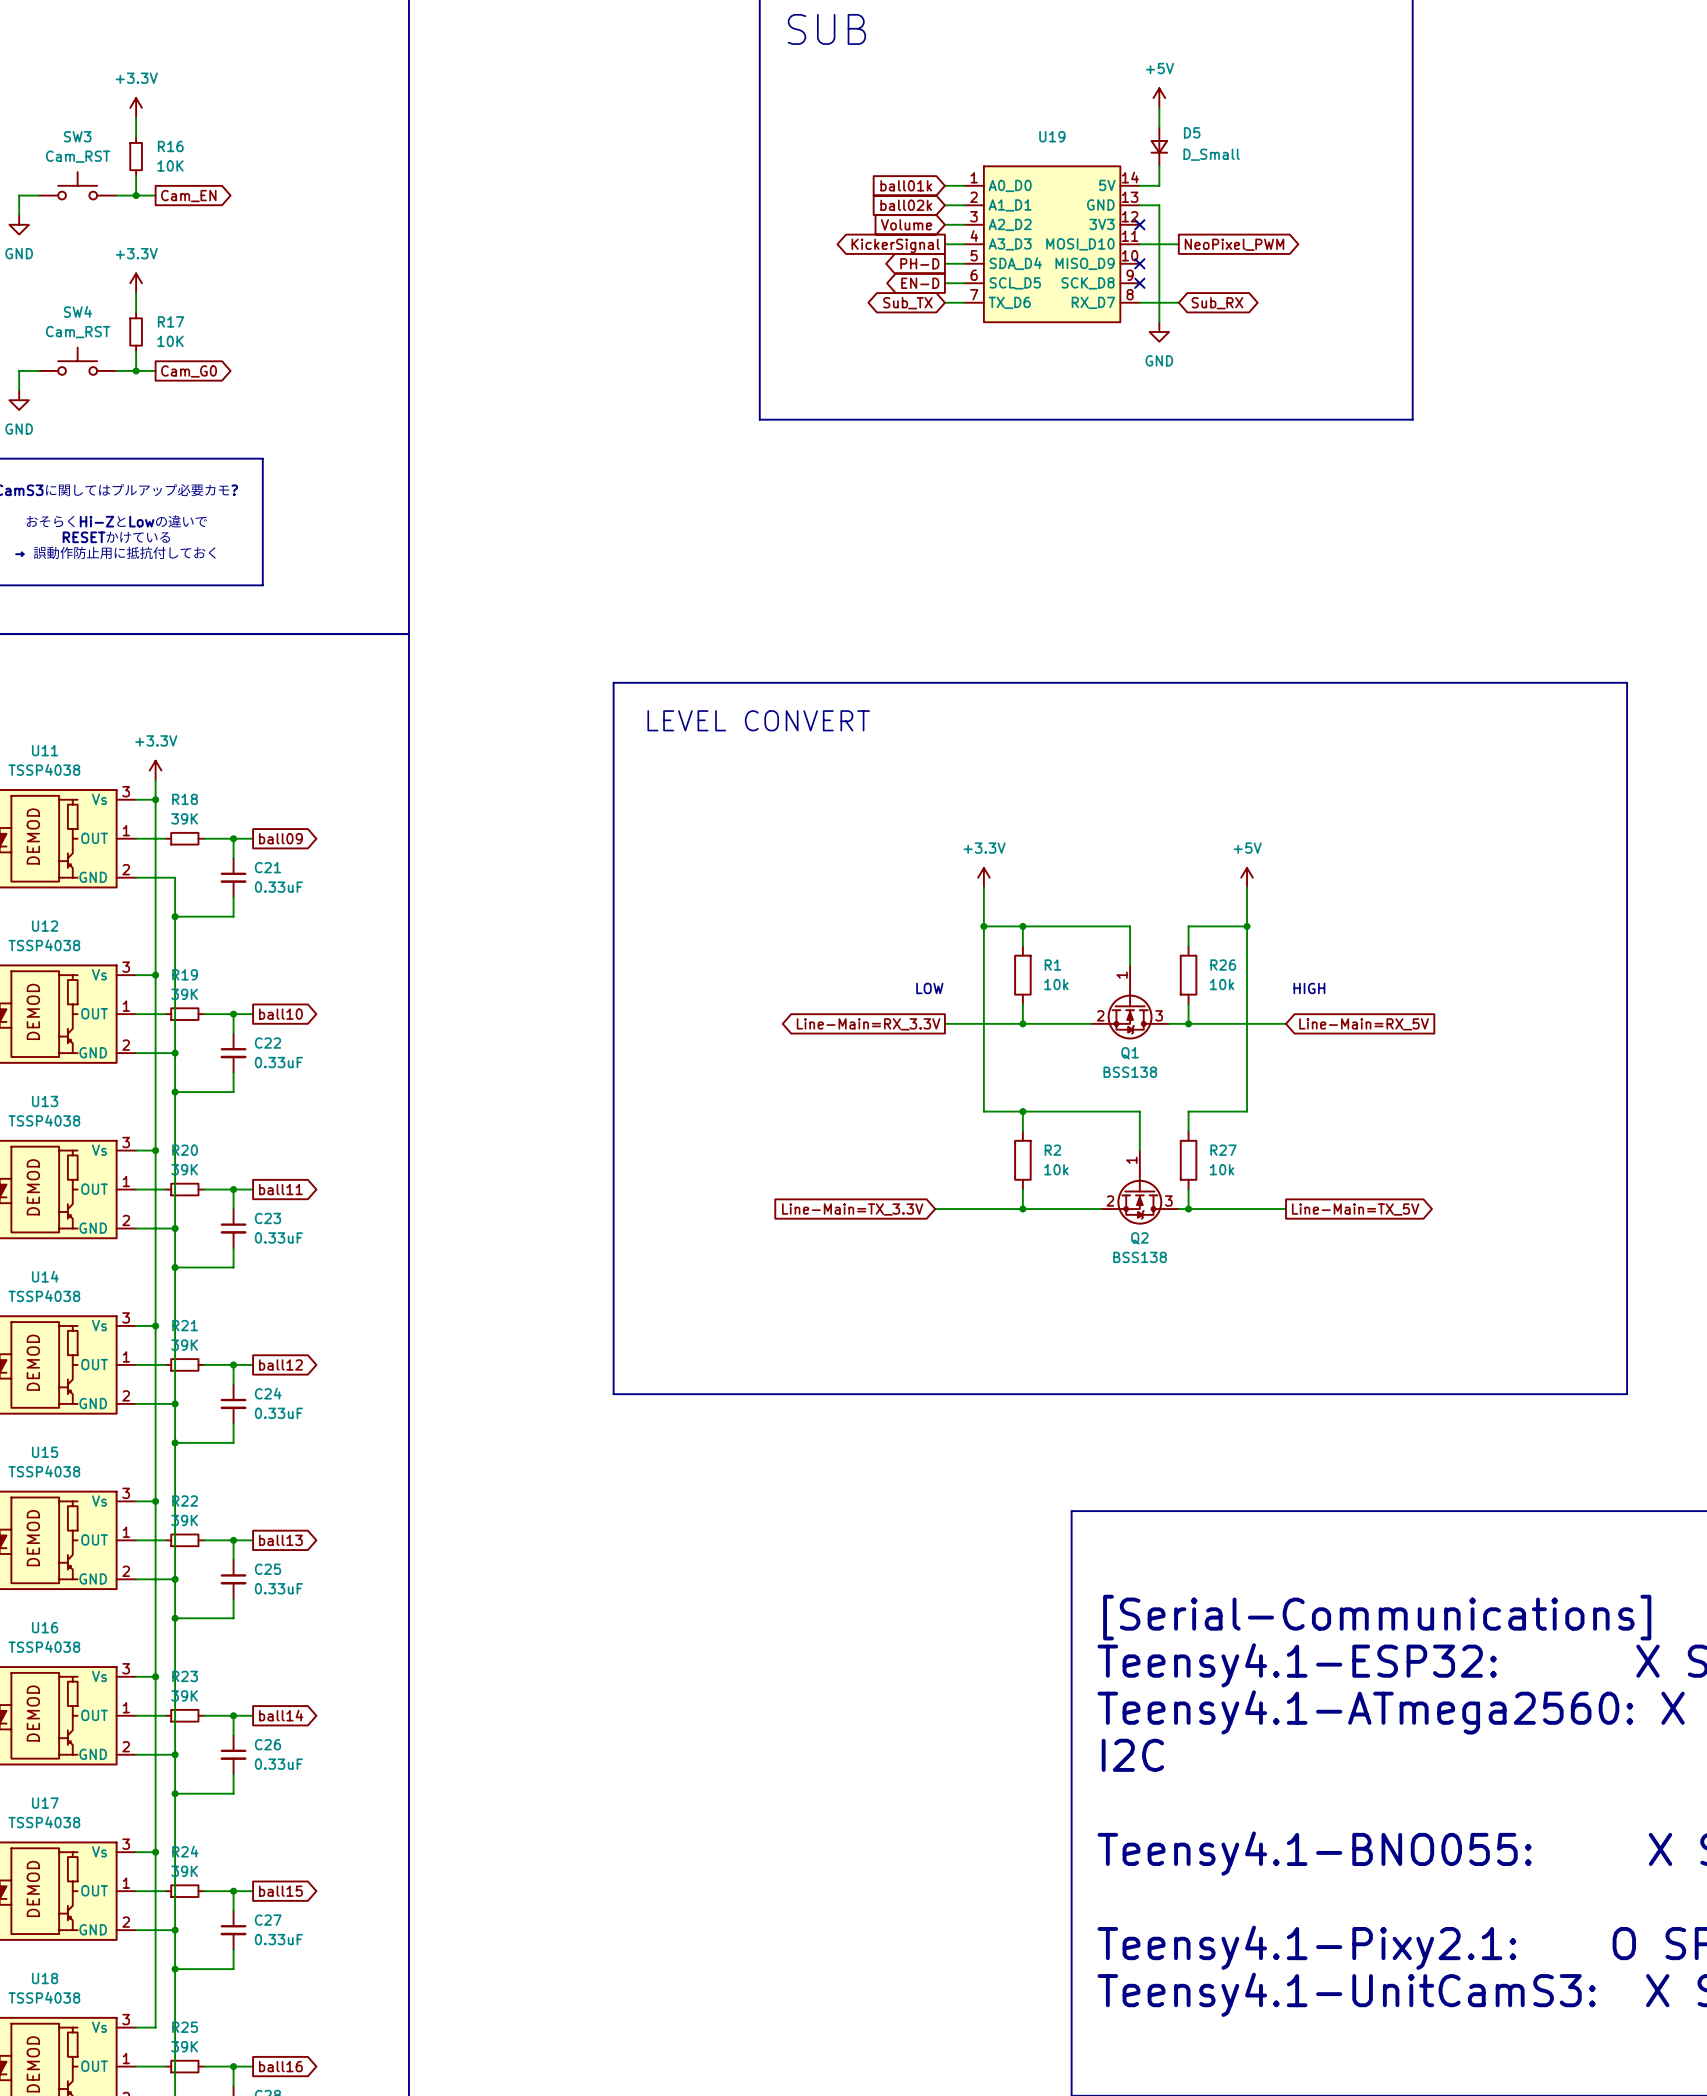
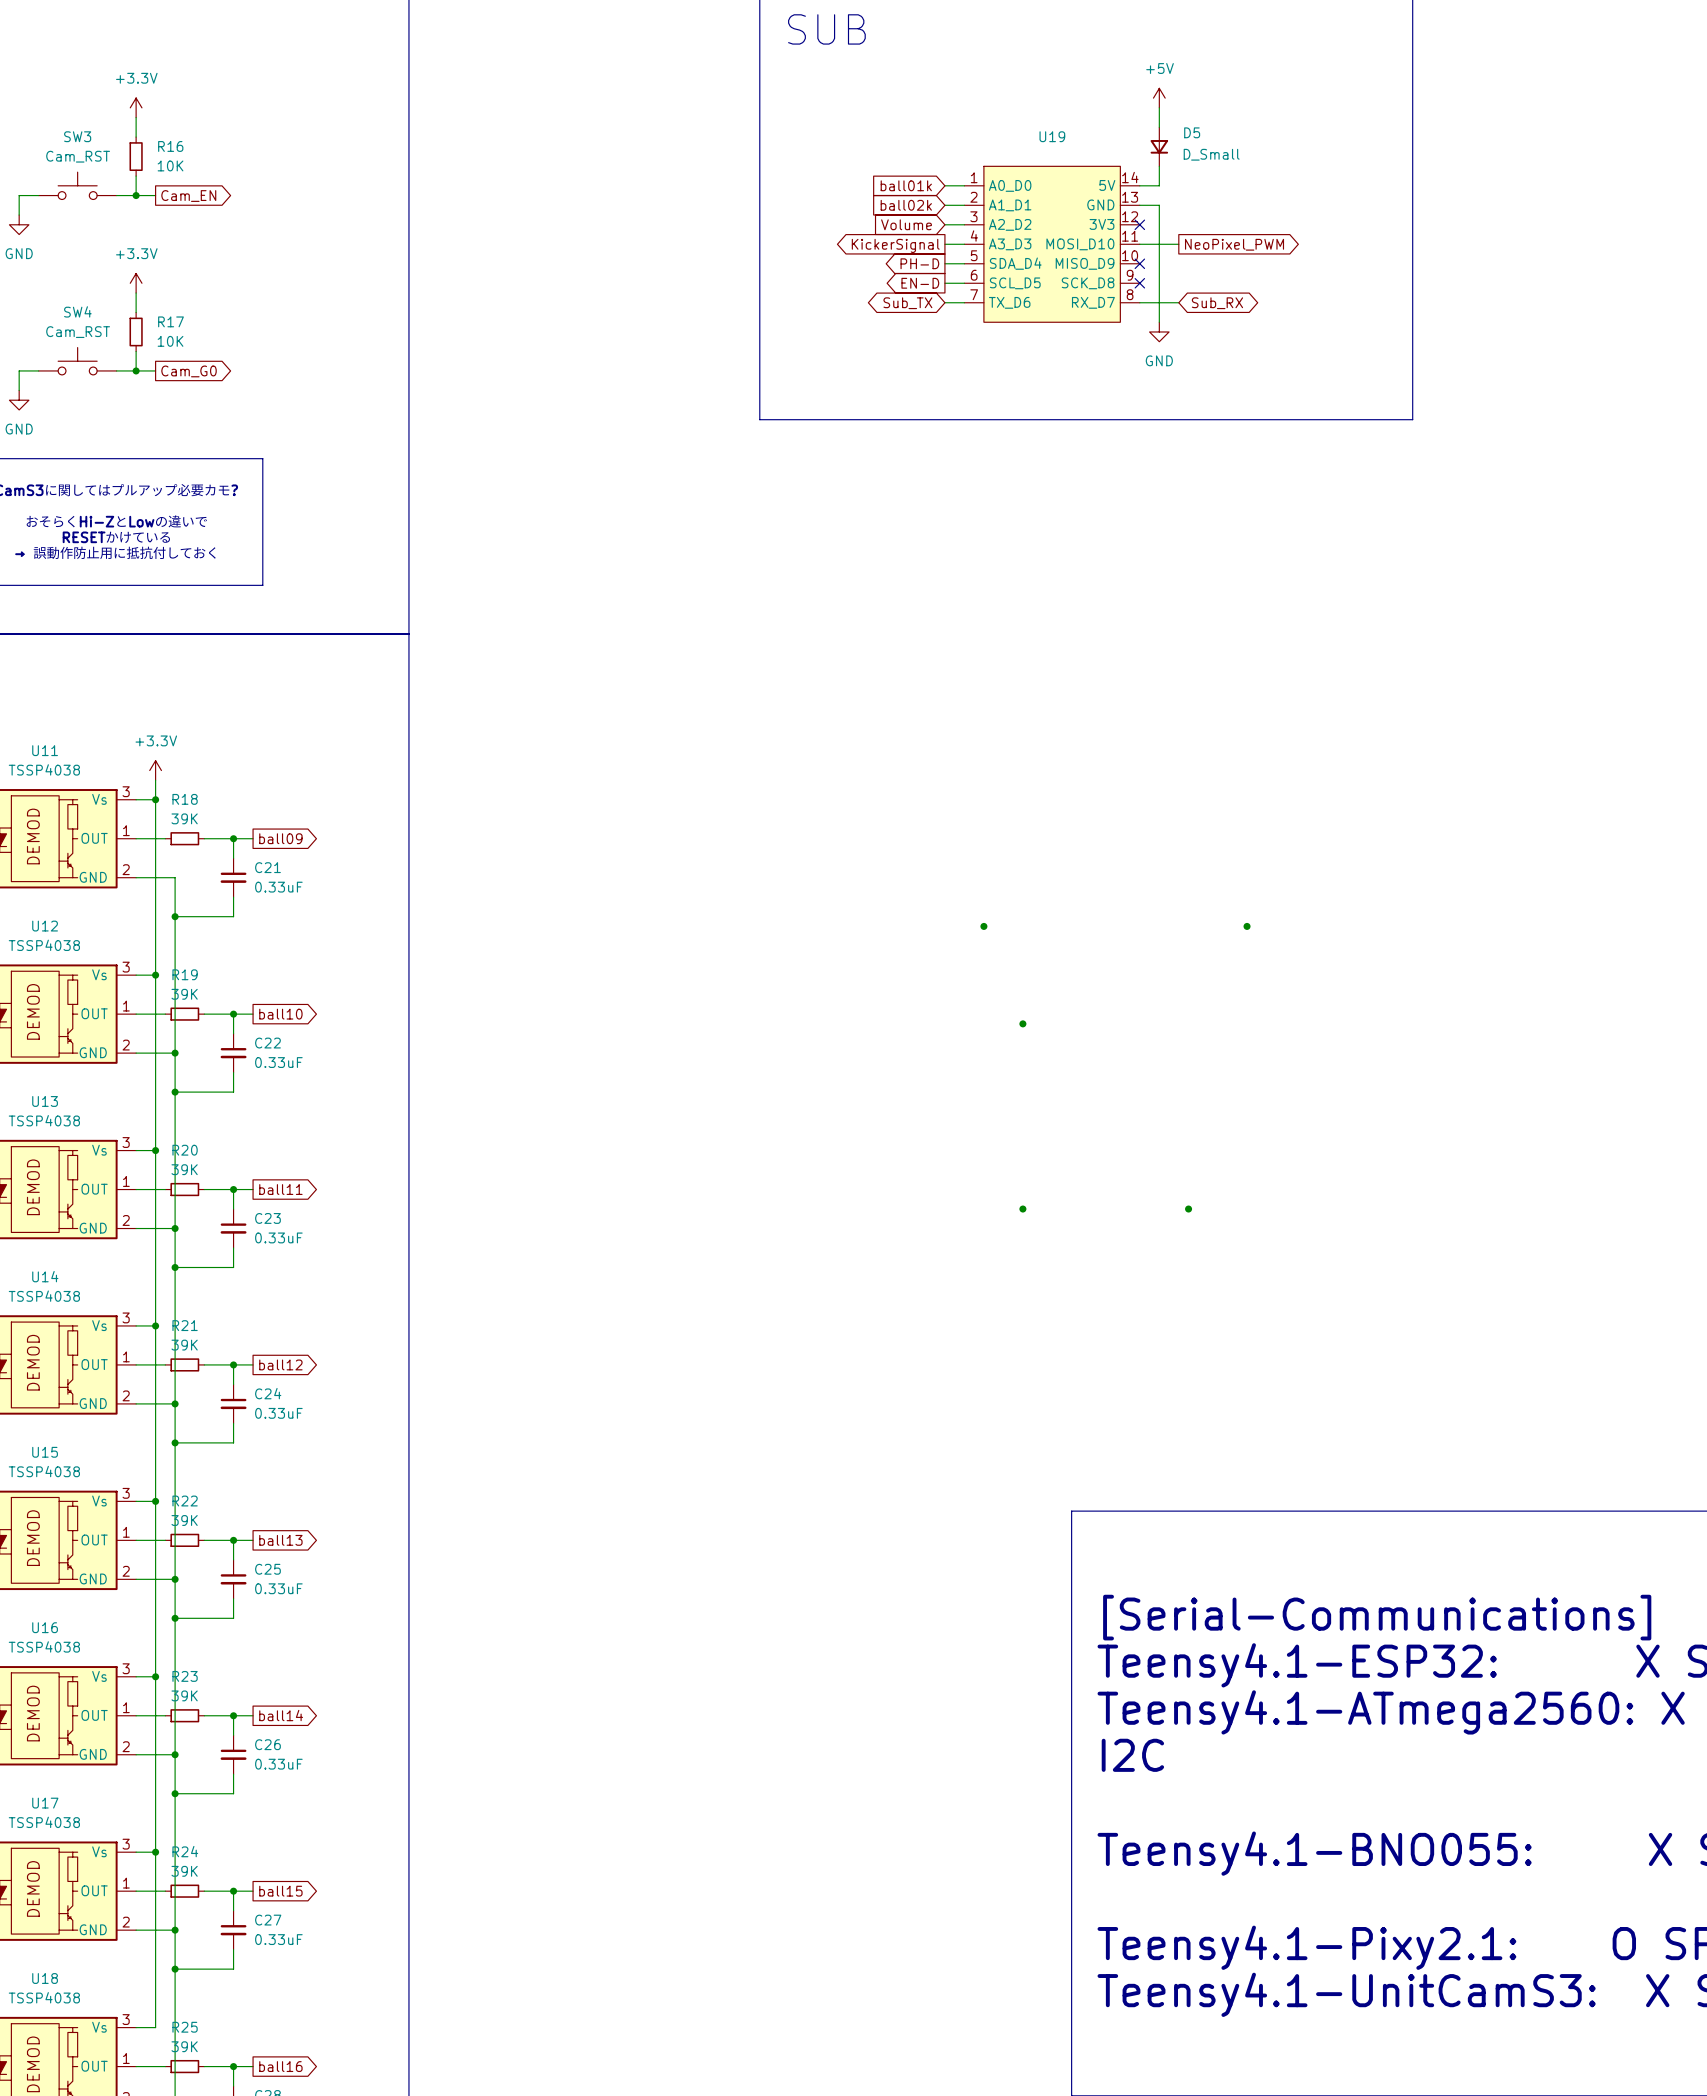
line: (613, 682) (1627, 682) (1627, 1394) (613, 1394) (613, 682) -> none
text: LEVEL CONVERT (758, 720) -> none
power symbol: +3.3V (983, 877) -> none
power symbol: +5V (1247, 877) -> none
wire: (983, 887) (983, 1111) (1139, 1111) (1139, 1150) -> none
wire: (1247, 887) (1247, 1111) (1188, 1111) (1188, 1131) -> none
wire: (983, 926) (1130, 926) (1130, 965) -> none
wire: (1022, 926) (1022, 945) -> none
junction: (1022, 926) -> none
wire: (1247, 926) (1188, 926) (1188, 945) -> none
R1: 10k (1022, 975) -> none
R26: 10k (1188, 975) -> none
text: LOW (929, 988) -> none
text: HIGH (1309, 988) -> none
Q1: BSS138 (1130, 1002) -> none
wire: (1022, 1004) (1022, 1023) -> none
wire: (1188, 1004) (1188, 1023) -> none
wire: (944, 1023) (1091, 1023) -> none
wire: (1169, 1023) (1286, 1023) -> none
junction: (1188, 1023) -> none
global label: Line-Main=RX_3.3V (868, 1024) -> none
global label: Line-Main=RX_5V (1364, 1024) -> none
wire: (1022, 1111) (1022, 1131) -> none
junction: (1022, 1111) -> none
R2: 10k (1022, 1160) -> none
R27: 10k (1188, 1160) -> none
Q2: BSS138 (1139, 1187) -> none
wire: (1022, 1189) (1022, 1209) -> none
wire: (1188, 1189) (1188, 1209) -> none
global label: Line-Main=TX_3.3V (852, 1209) -> none
wire: (935, 1209) (1100, 1209) -> none
wire: (1178, 1209) (1286, 1209) -> none
global label: Line-Main=TX_5V (1355, 1209) -> none

